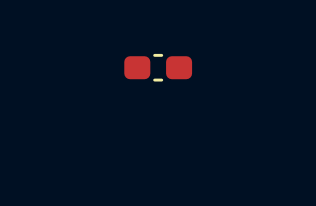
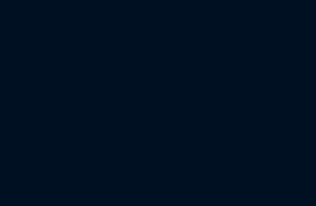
part: (158, 67) -> none

